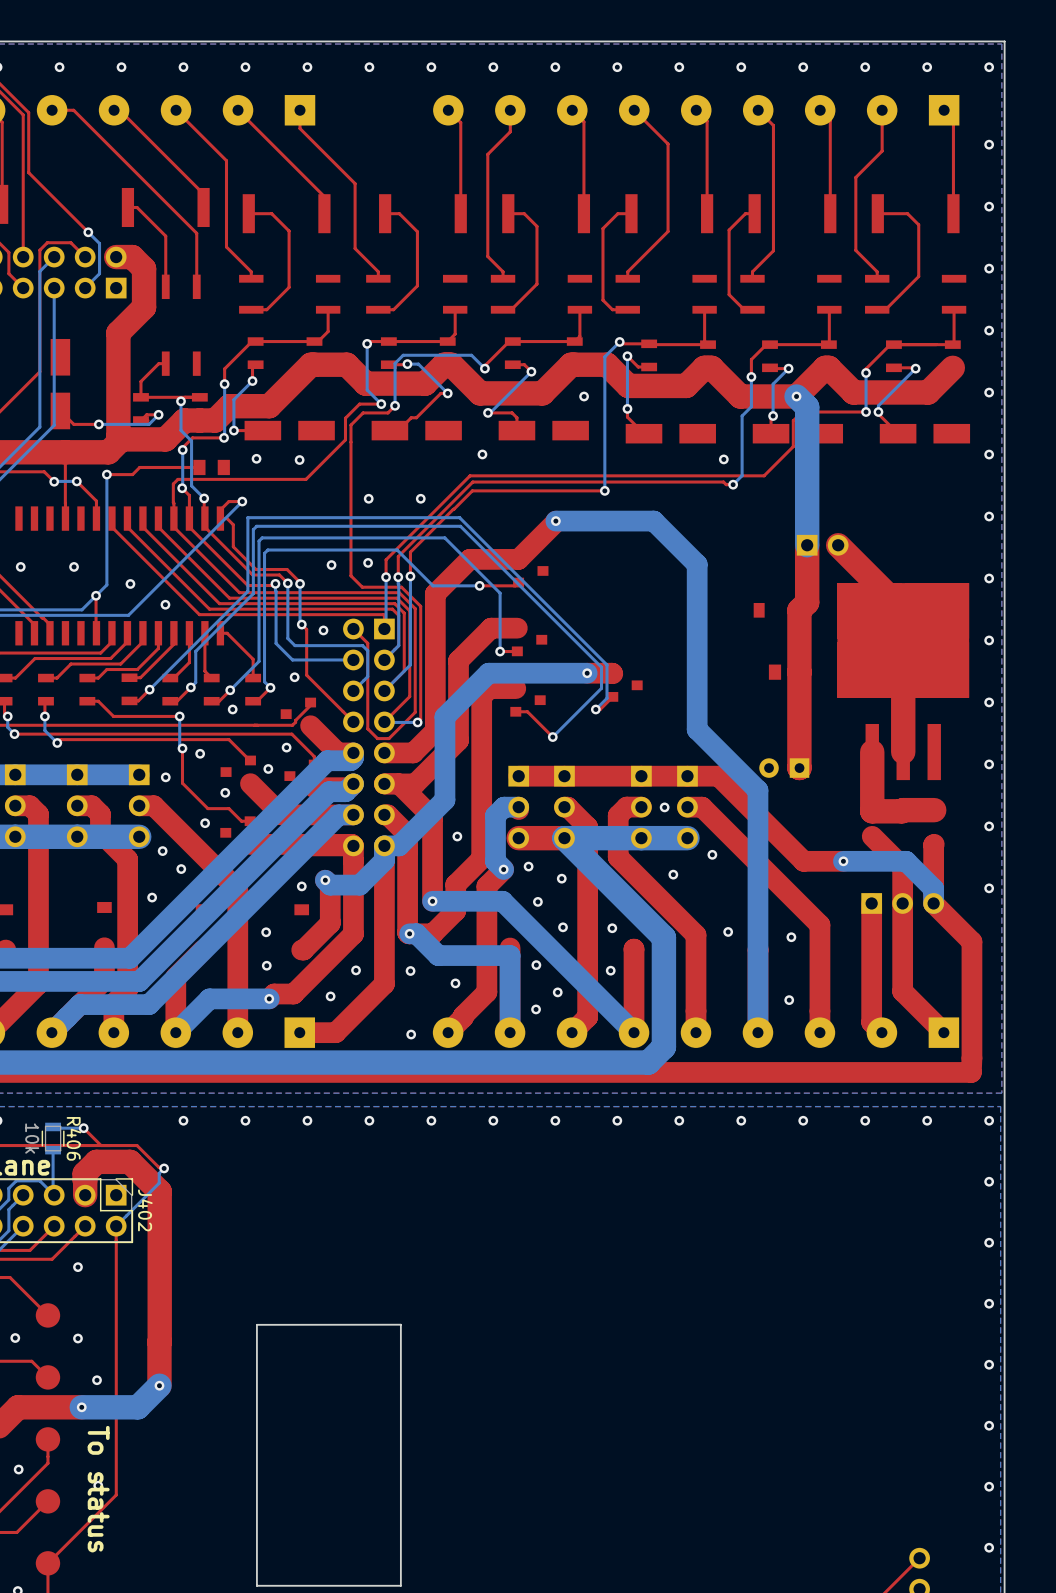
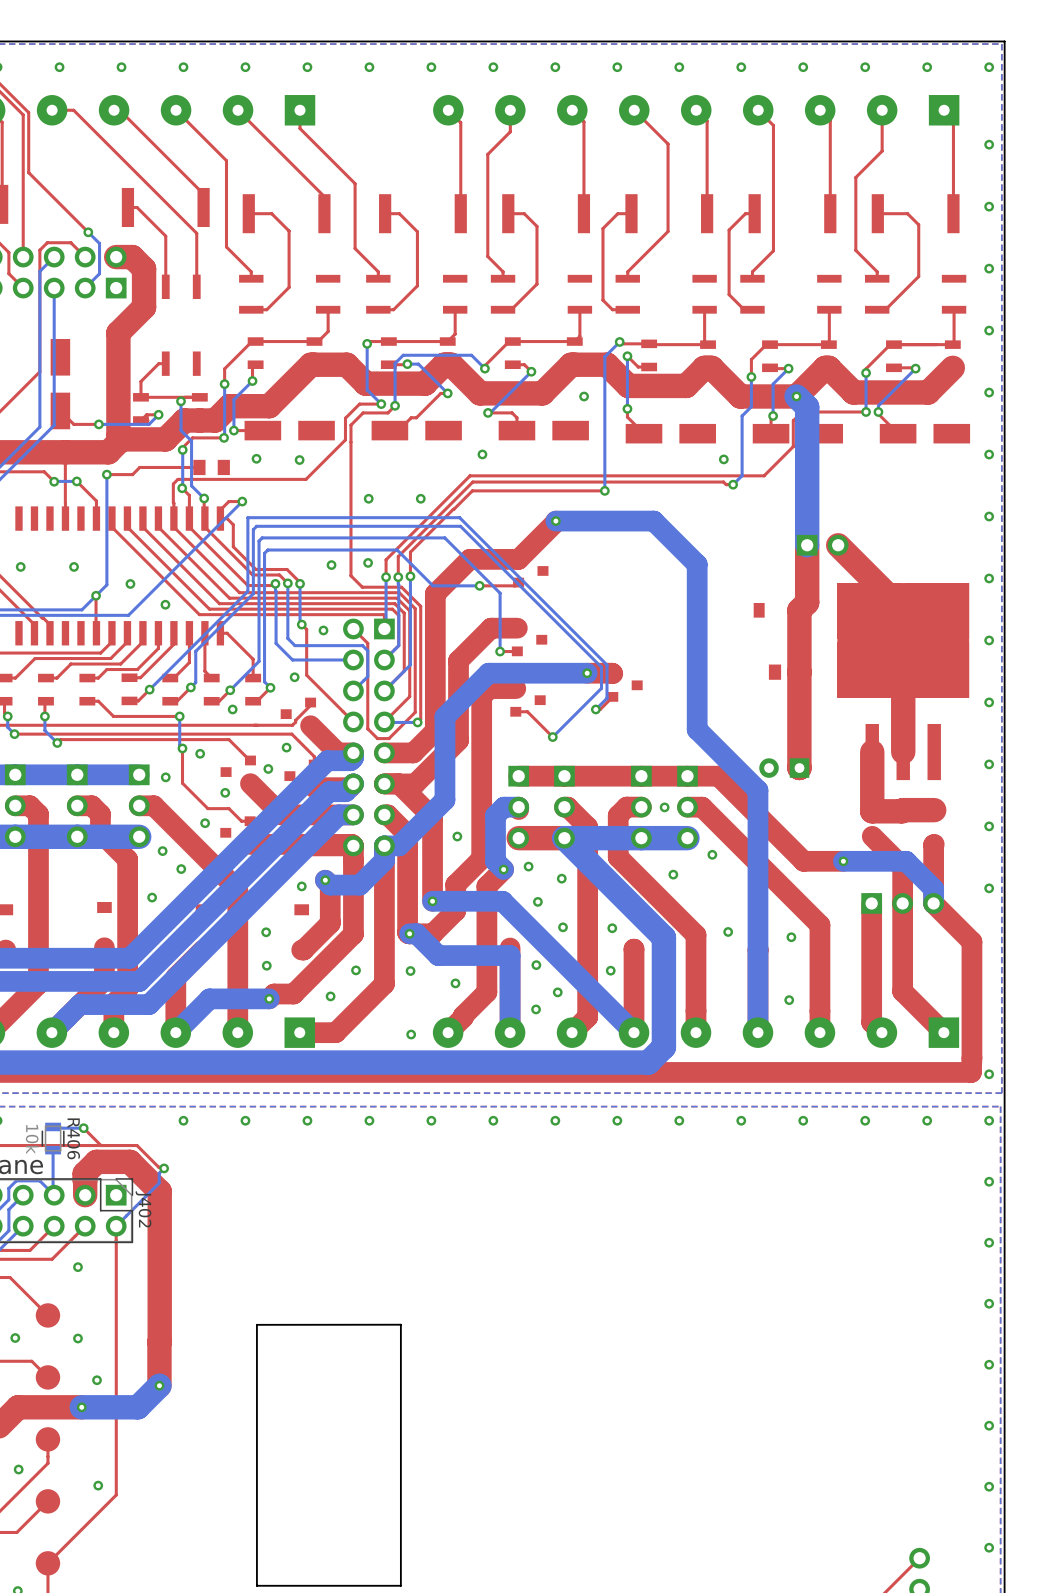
via: none -> (989, 1074)
text: To status (98, 1489) -> none

